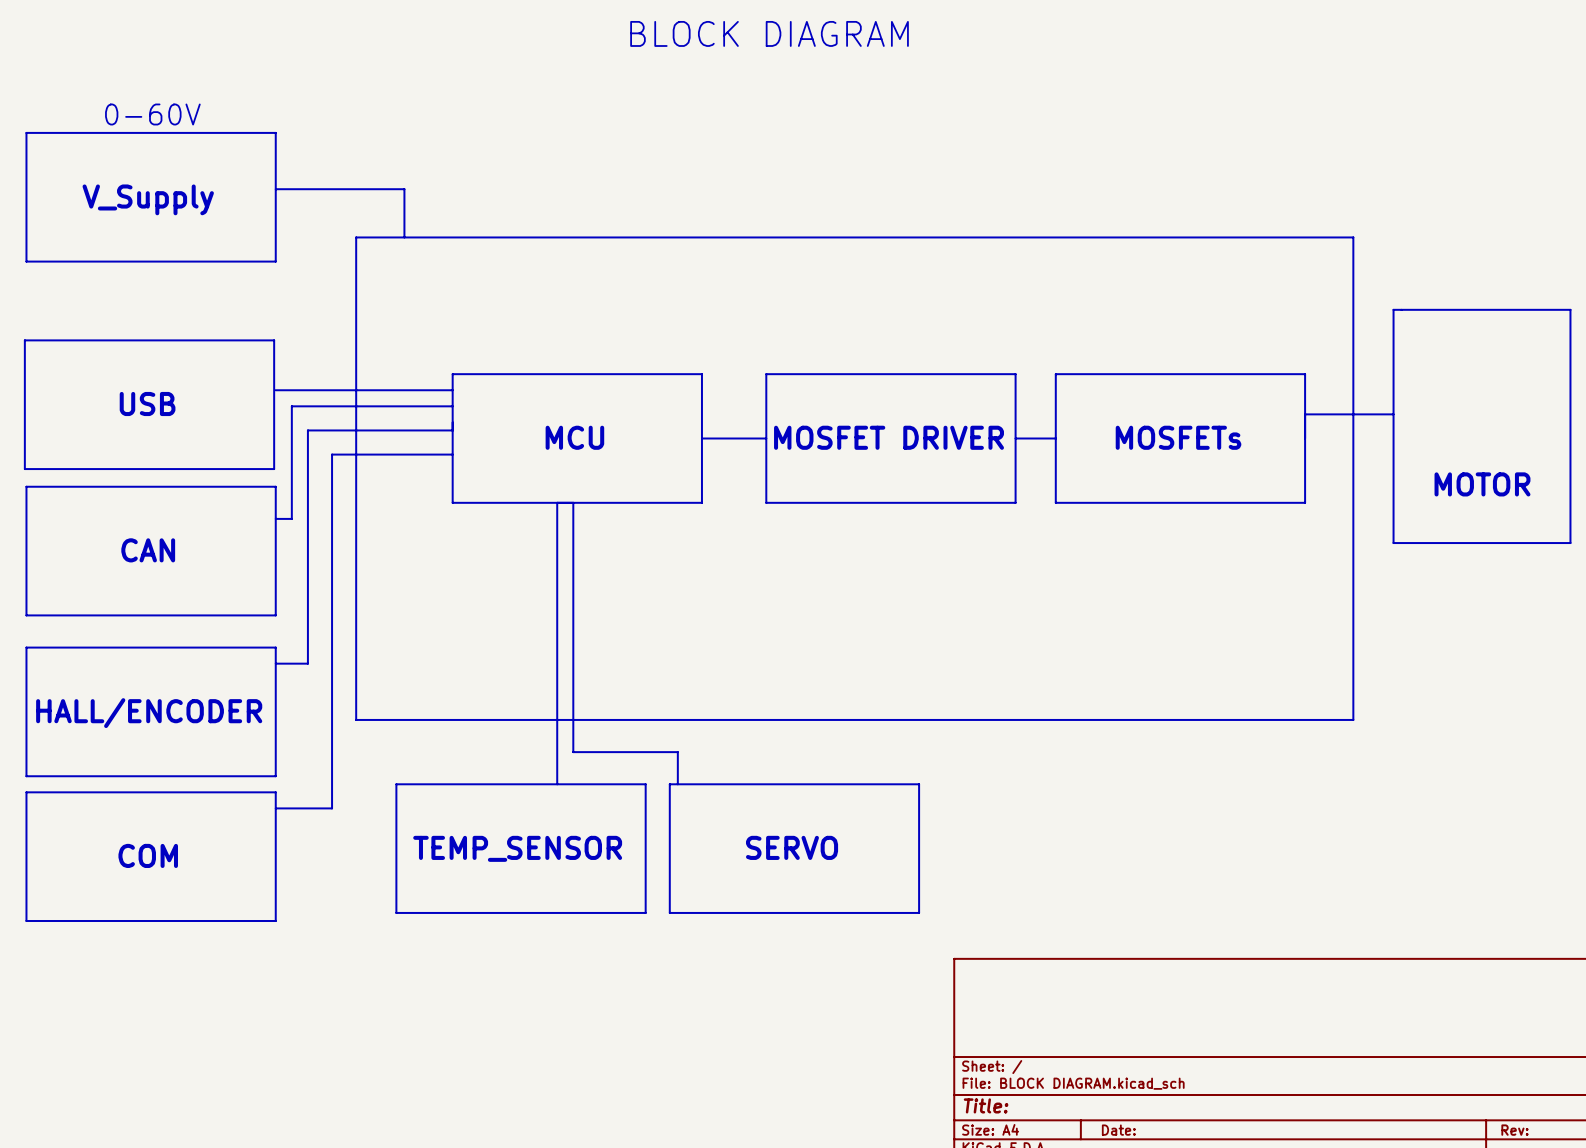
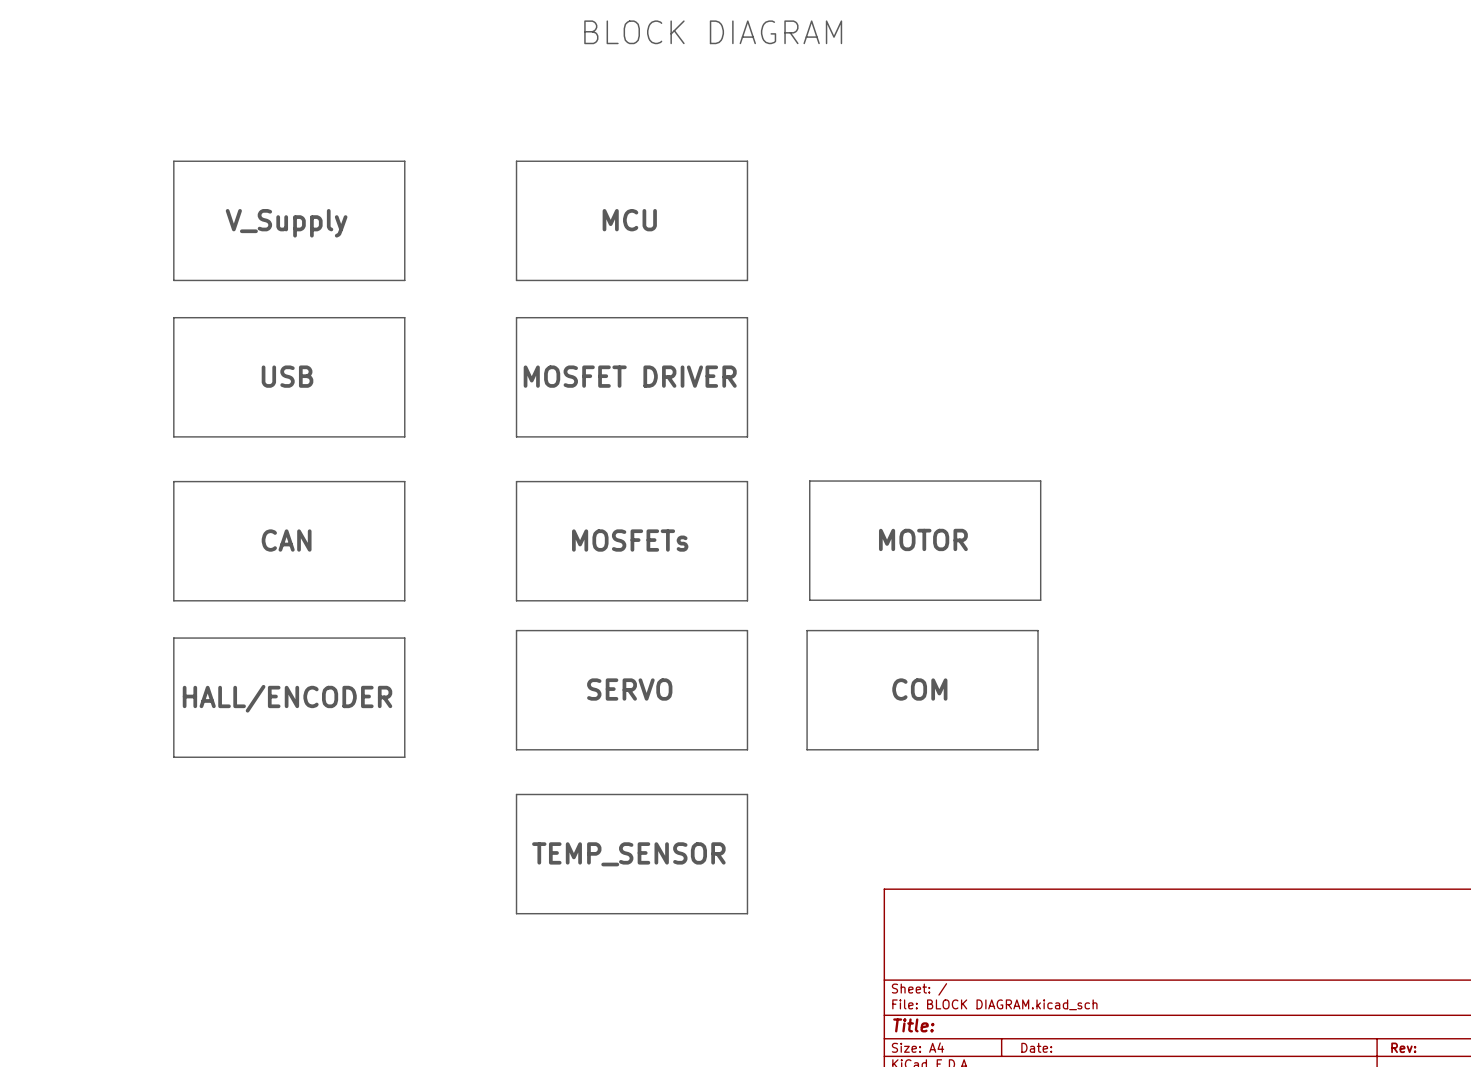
text: 0-60V (152, 114) -> none
line: (26, 132) (275, 132) (275, 261) (26, 261) (26, 132) -> none
line: none -> (173, 161) (404, 161) (404, 280) (173, 280) (173, 161)
line: none -> (516, 161) (516, 280) (747, 280) (747, 161) (516, 161)
line: (275, 189) (404, 189) (404, 237) -> none
text: V_Supply (148, 199) -> none
text: none -> MCU (629, 220)
line: (356, 237) (1353, 237) (1353, 719) (356, 719) (356, 237) -> none
text: none -> V_Supply (286, 223)
line: (1393, 309) (1570, 309) (1570, 543) (1393, 543) (1393, 309) -> none
line: (24, 340) (24, 469) (274, 469) (274, 340) (24, 340) -> none
line: none -> (173, 317) (173, 436) (404, 436) (404, 317) (173, 317)
line: (452, 374) (452, 502) (701, 502) (701, 374) (452, 374) -> (516, 317) (516, 436) (747, 436) (747, 317) (516, 317)
line: (766, 374) (1015, 374) (1015, 502) (766, 502) (766, 374) -> none
line: (1055, 374) (1055, 502) (1305, 502) (1305, 374) (1055, 374) -> none
line: (275, 390) (452, 390) -> none
text: USB (147, 403) -> none
text: none -> USB (287, 376)
text: none -> MOSFET DRIVER (630, 376)
line: (452, 406) (291, 406) (291, 518) -> (255, 600) (404, 600) (404, 481) (270, 481)
line: (1305, 414) (1393, 414) -> none
line: (452, 430) (307, 430) (307, 663) (275, 663) -> none
text: MCU (574, 437) -> none
text: MOSFET DRIVER (889, 437) -> none
text: MOSFETs (1178, 437) -> none
line: (701, 438) (766, 438) -> none
line: (1015, 438) (1055, 438) -> none
line: (452, 454) (332, 454) (332, 808) (275, 808) -> none
text: MOTOR (1482, 484) -> none
line: (26, 486) (26, 615) (275, 615) (275, 486) (26, 486) -> none
line: (557, 502) (557, 518) -> (516, 600) (747, 600) (747, 481) (516, 481)
line: (573, 502) (573, 752) (677, 752) (677, 784) -> none
line: none -> (809, 481) (809, 600) (1040, 600) (1040, 481) (809, 481)
text: CAN (148, 550) -> none
text: none -> MOTOR (923, 539)
text: none -> CAN (286, 540)
text: none -> MOSFETs (630, 540)
line: (187, 647) (26, 647) (26, 776) (275, 776) (275, 647) -> (173, 600) (173, 481) (255, 481)
line: (557, 647) (557, 679) -> (516, 727) (516, 749) (747, 749) (747, 630) (516, 630)
line: none -> (807, 630) (1038, 630) (1038, 749) (807, 749) (807, 630)
line: none -> (173, 638) (173, 757) (404, 757) (404, 638) (173, 638)
text: HALL/ENCODER (149, 713) -> none
text: none -> COM (919, 689)
text: none -> HALL/ENCODER (287, 698)
line: (396, 784) (645, 784) (645, 912) (396, 912) (396, 784) -> none
line: (669, 784) (919, 784) (919, 912) (669, 912) (669, 784) -> (516, 794) (747, 794) (747, 913) (516, 913) (516, 794)
line: (26, 792) (26, 920) (275, 920) (275, 792) (26, 792) -> none
text position: SERVO (792, 847) -> SERVO (629, 689)
text: TEMP_SENSOR (517, 848) -> none
text: COM (148, 855) -> none
text: none -> TEMP_SENSOR (628, 854)

